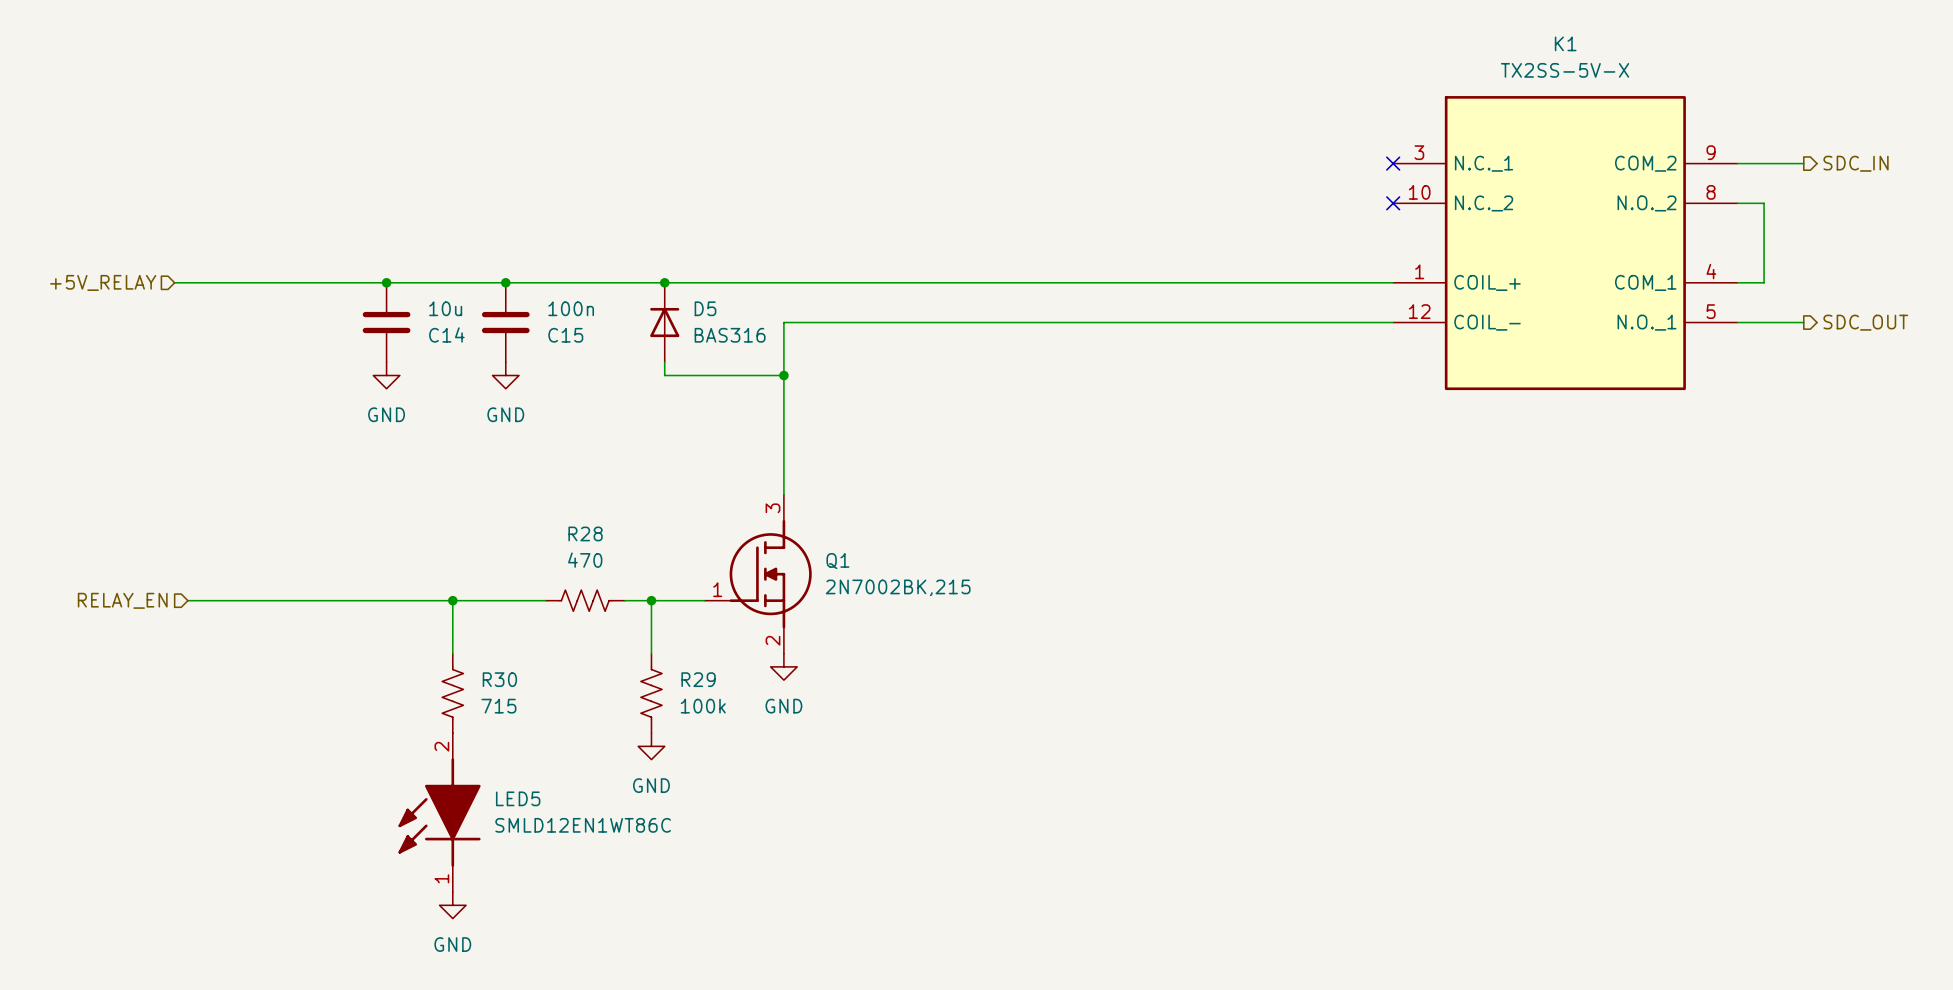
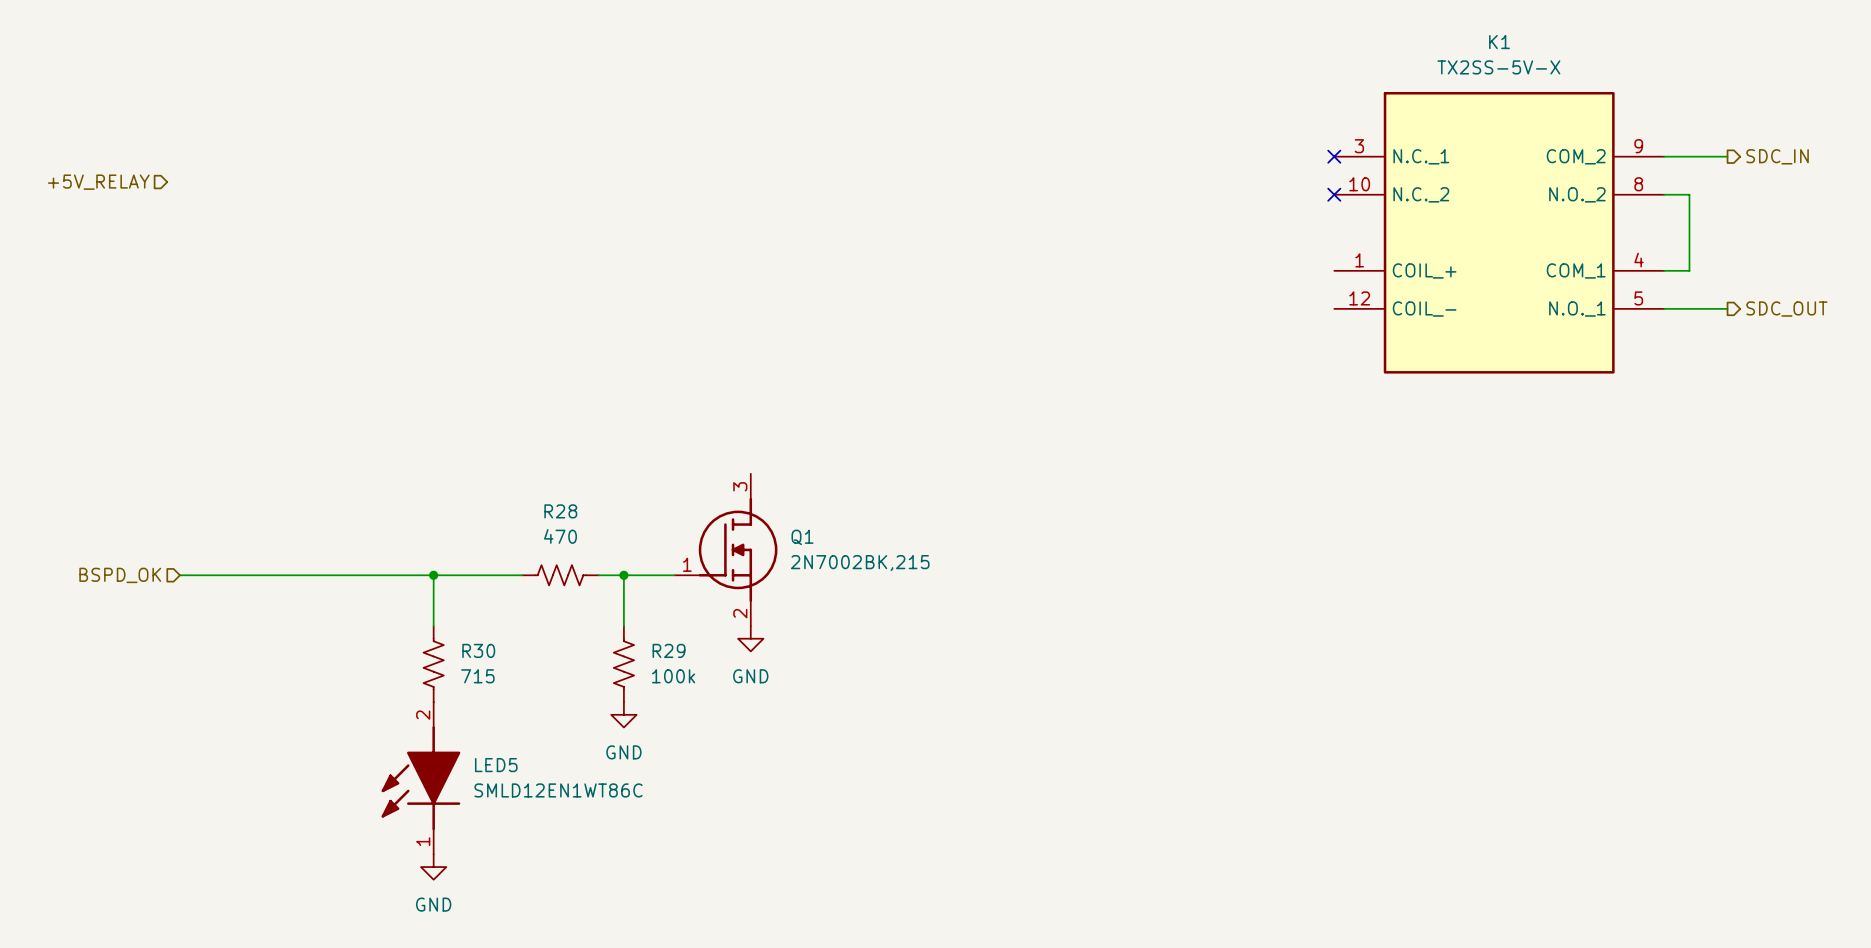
hierarchical label position: +5V_RELAY (103, 282) -> +5V_RELAY (98, 182)
wire: (174, 282) (1393, 282) -> none
junction: (386, 282) -> none
junction: (505, 282) -> none
junction: (664, 282) -> none
C14: 10u (386, 322) -> none
C15: 100n (505, 322) -> none
D5: BAS316 (664, 322) -> none
wire: (1393, 322) (783, 322) (783, 494) -> none
wire: (664, 362) (664, 375) (783, 375) -> none
power symbol: GND (386, 375) -> none
power symbol: GND (505, 375) -> none
junction: (783, 375) -> none
hierarchical label: RELAY_EN (122, 600) -> BSPD_OK (120, 575)

